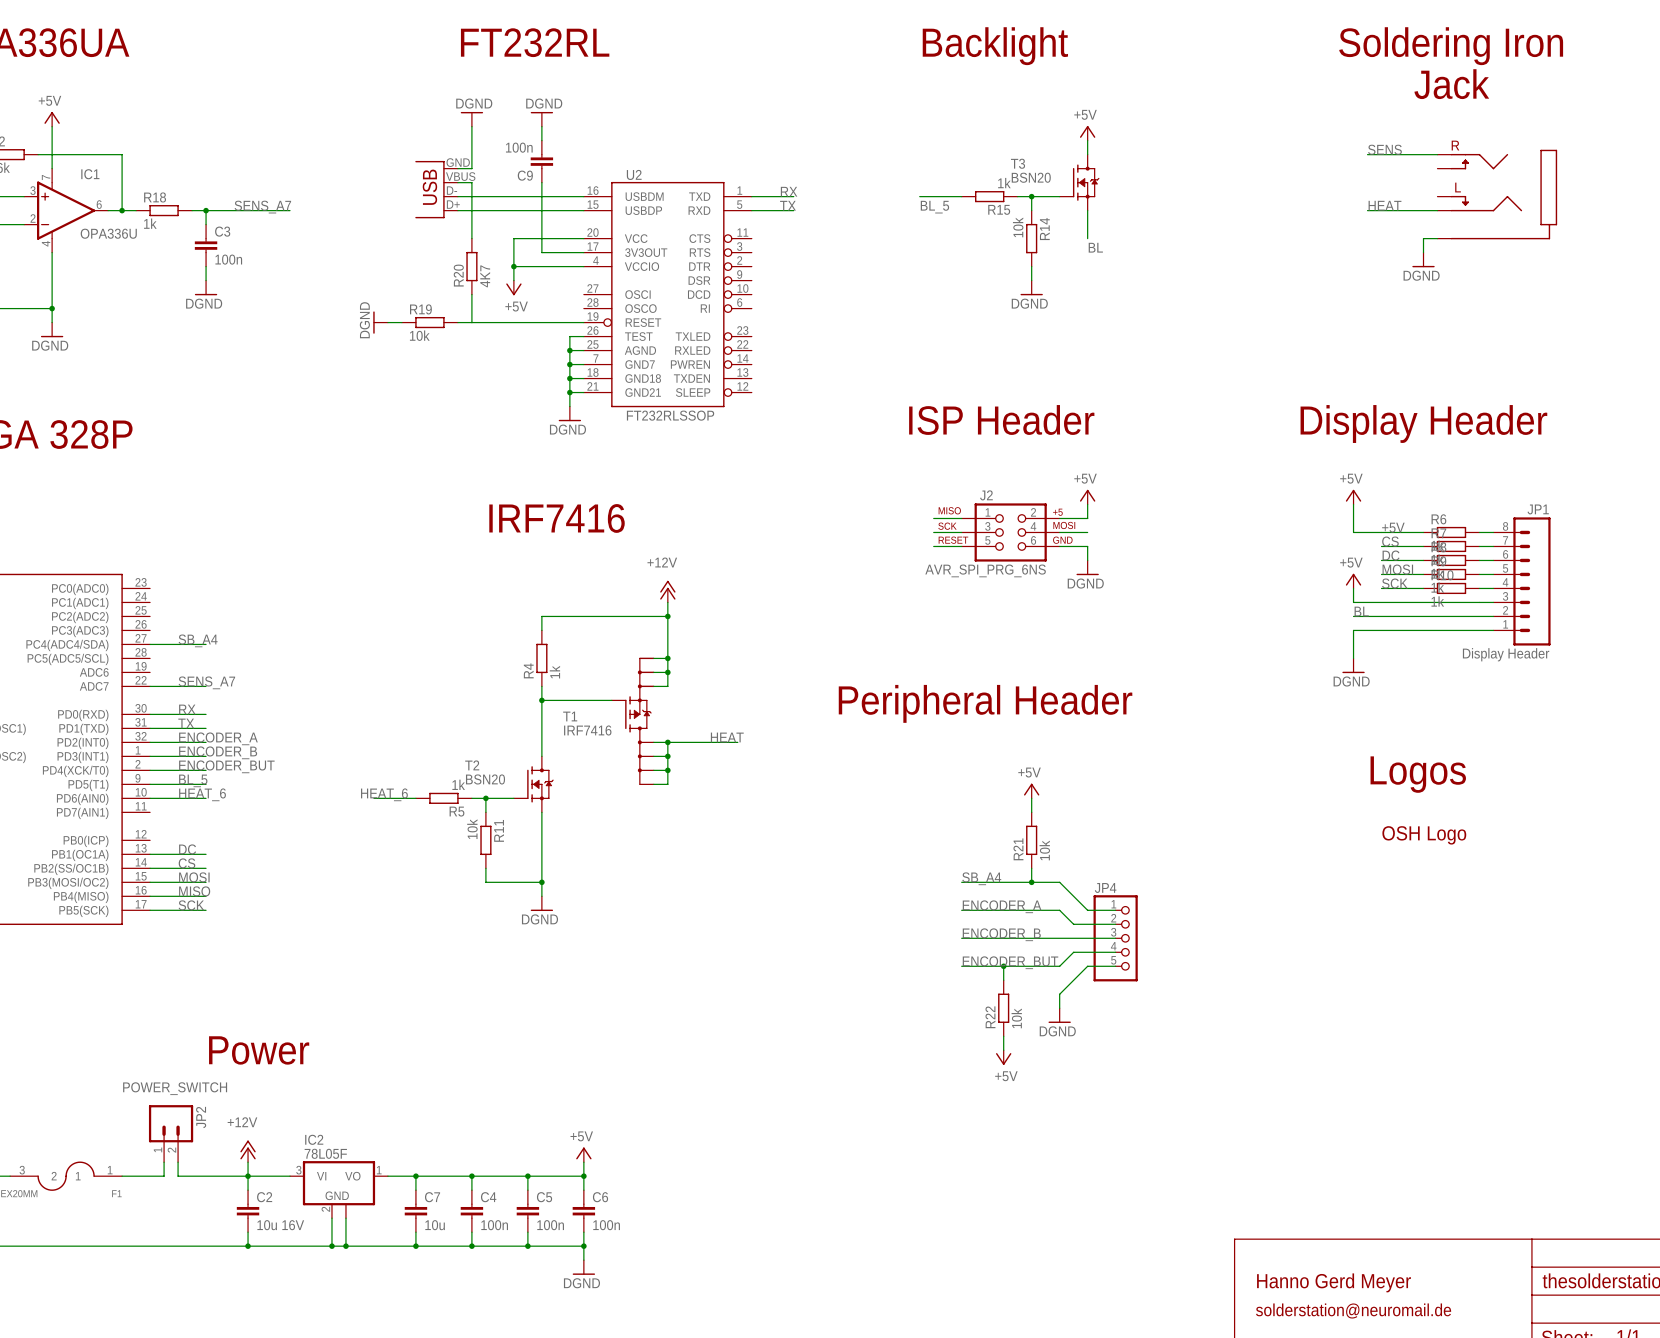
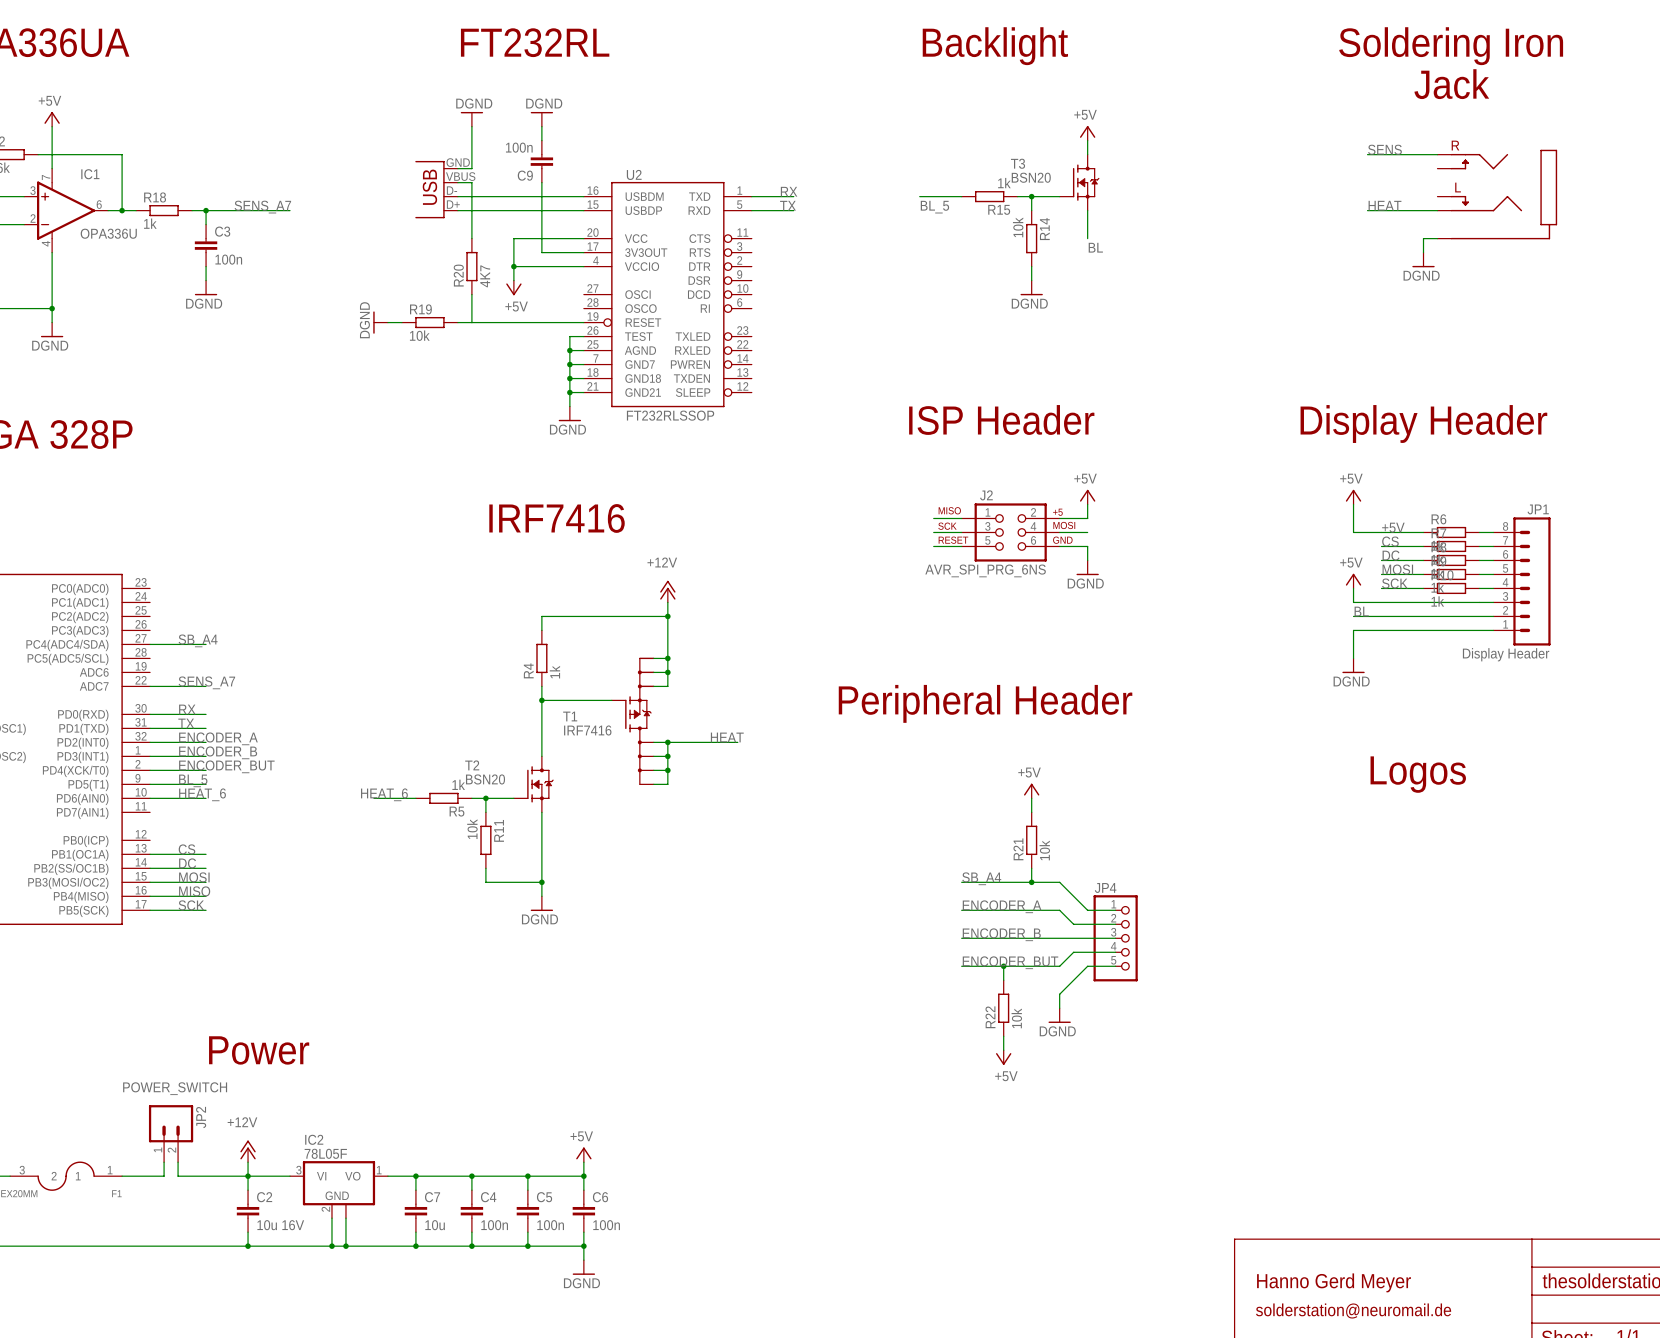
part: (1424, 835) -> none
label: DC (187, 849) -> CS (186, 849)
label: CS (186, 863) -> DC (187, 863)

